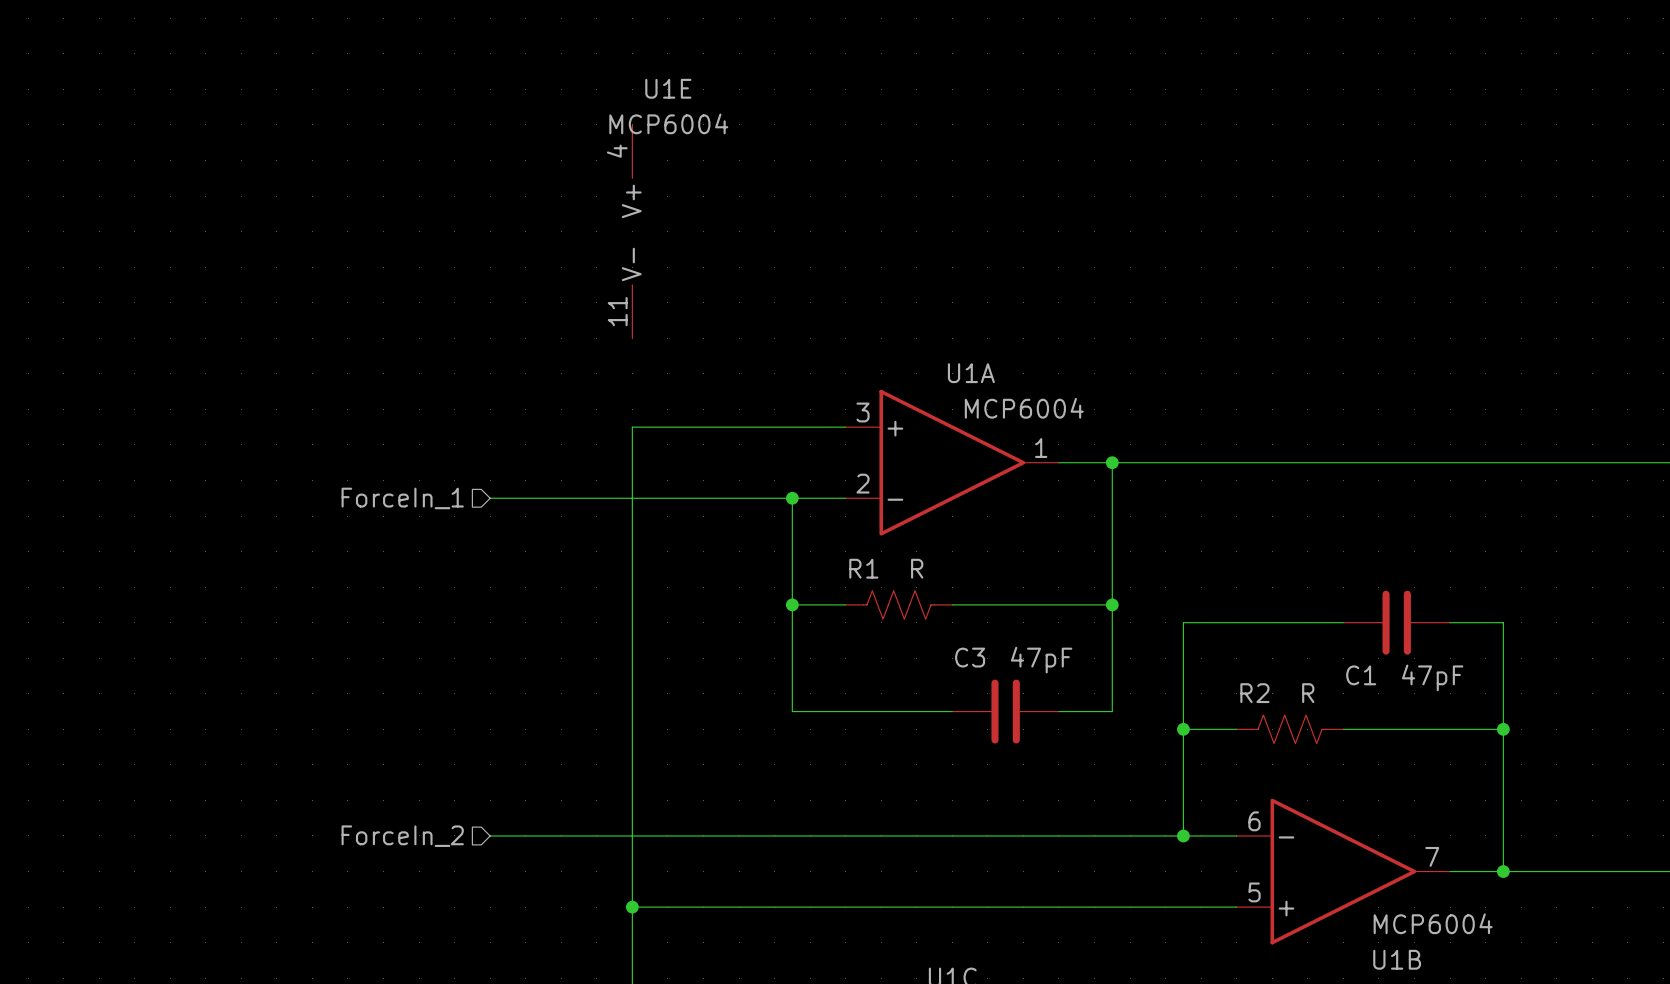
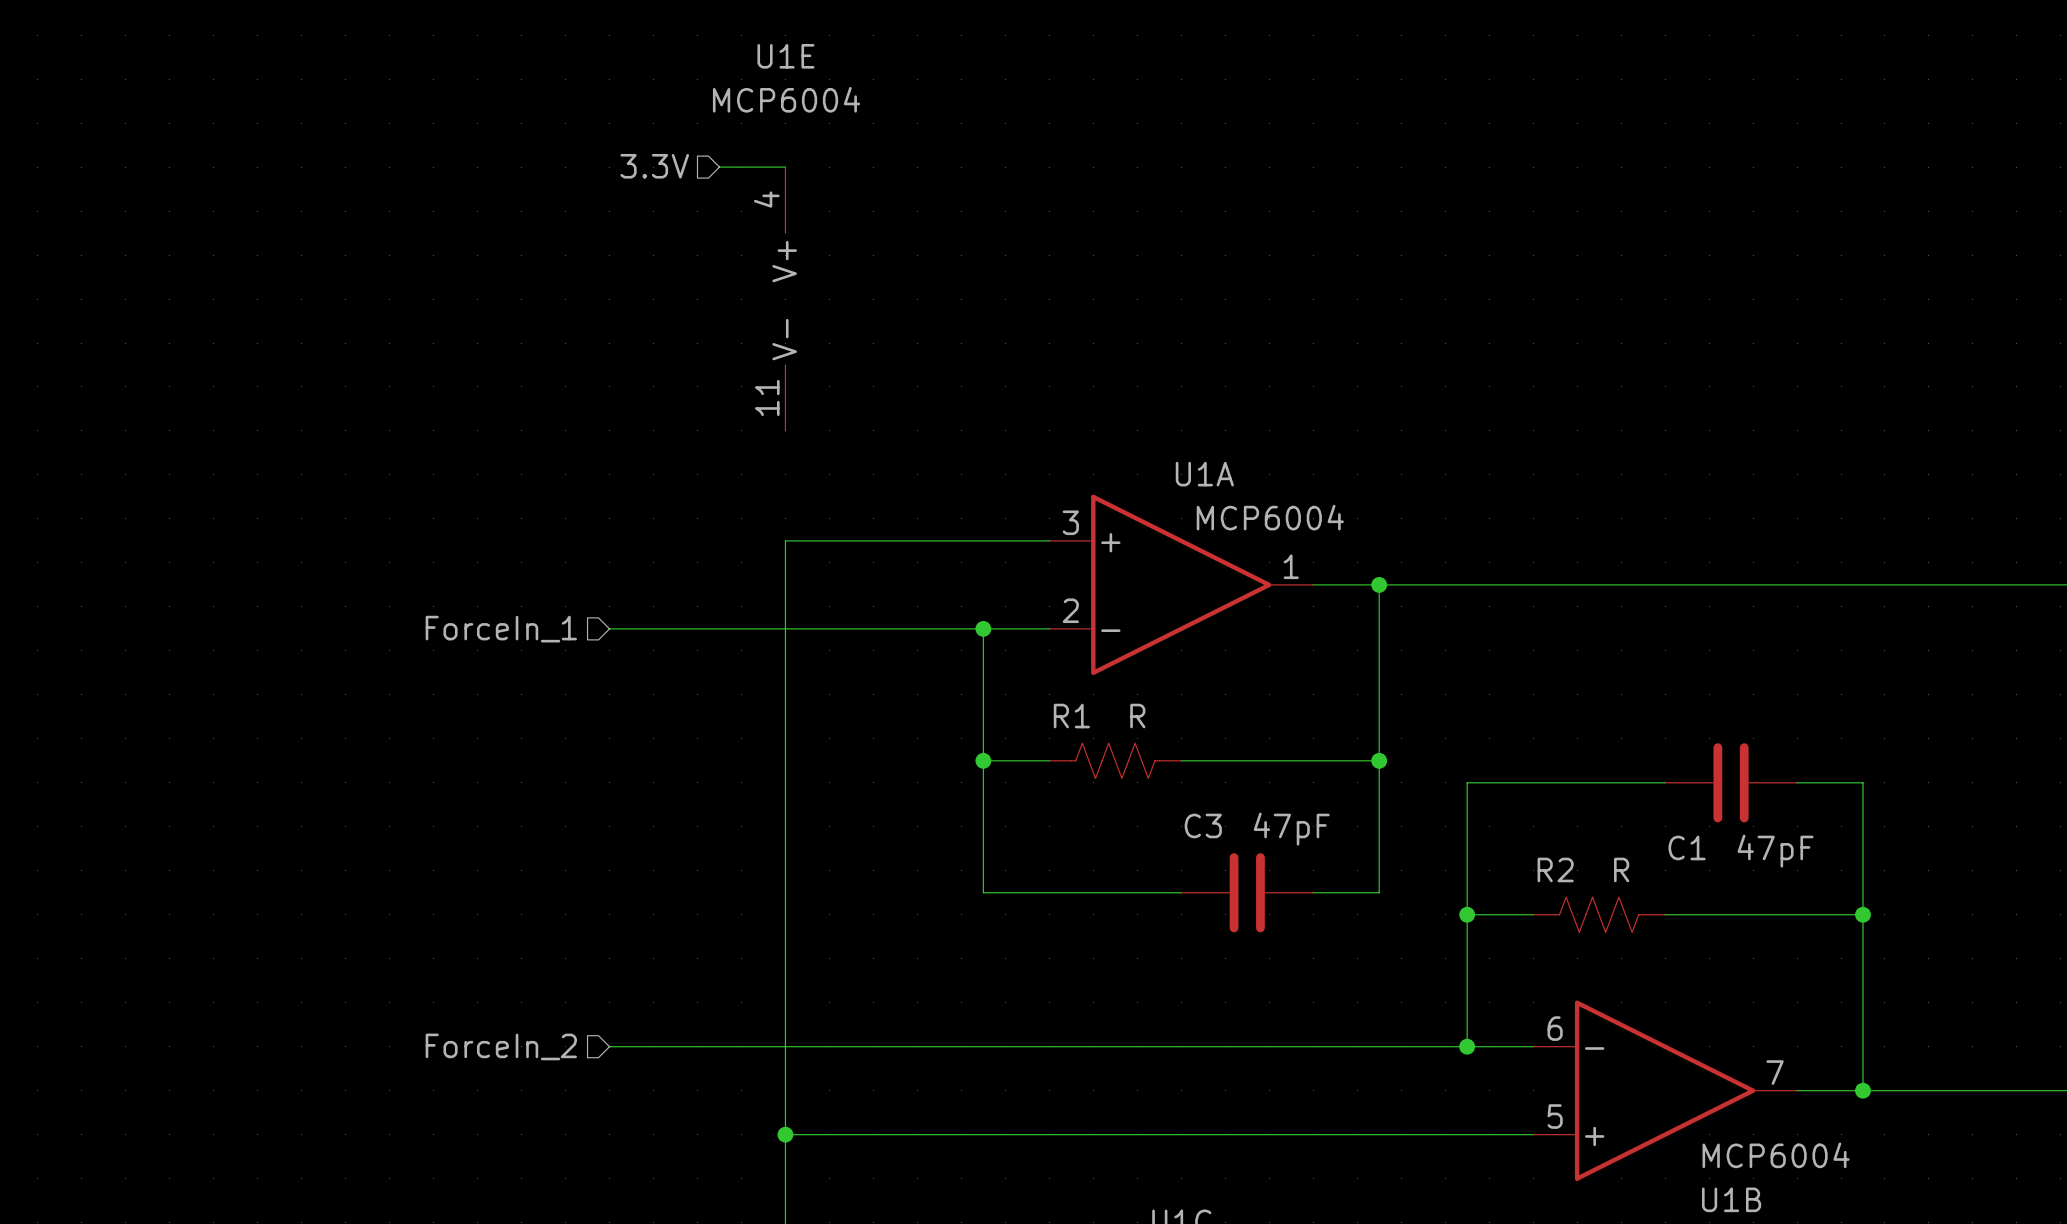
U1E name position: U1E (668, 88) -> U1E (785, 56)
U1E value position: MCP6004 (668, 123) -> MCP6004 (786, 99)
hierarchical label: none -> 3.3V (654, 166)
wire: none -> (719, 167) (785, 167)

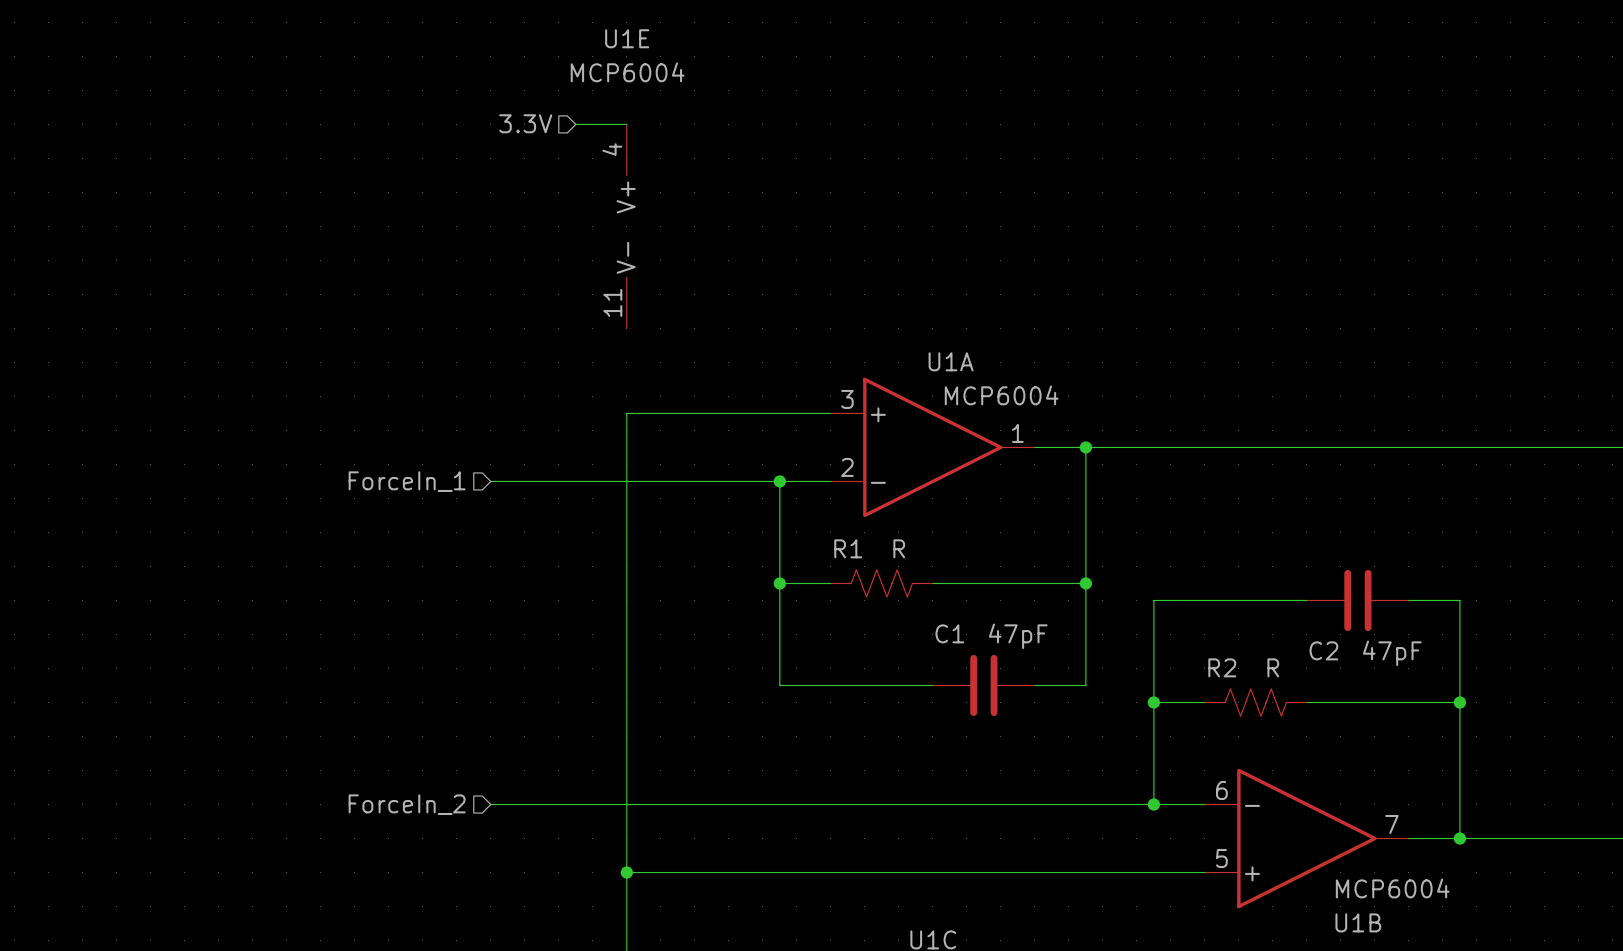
C3 name: C3 (1203, 825) -> C1 (949, 633)
C1 name: C1 (1687, 847) -> C2 (1323, 650)

